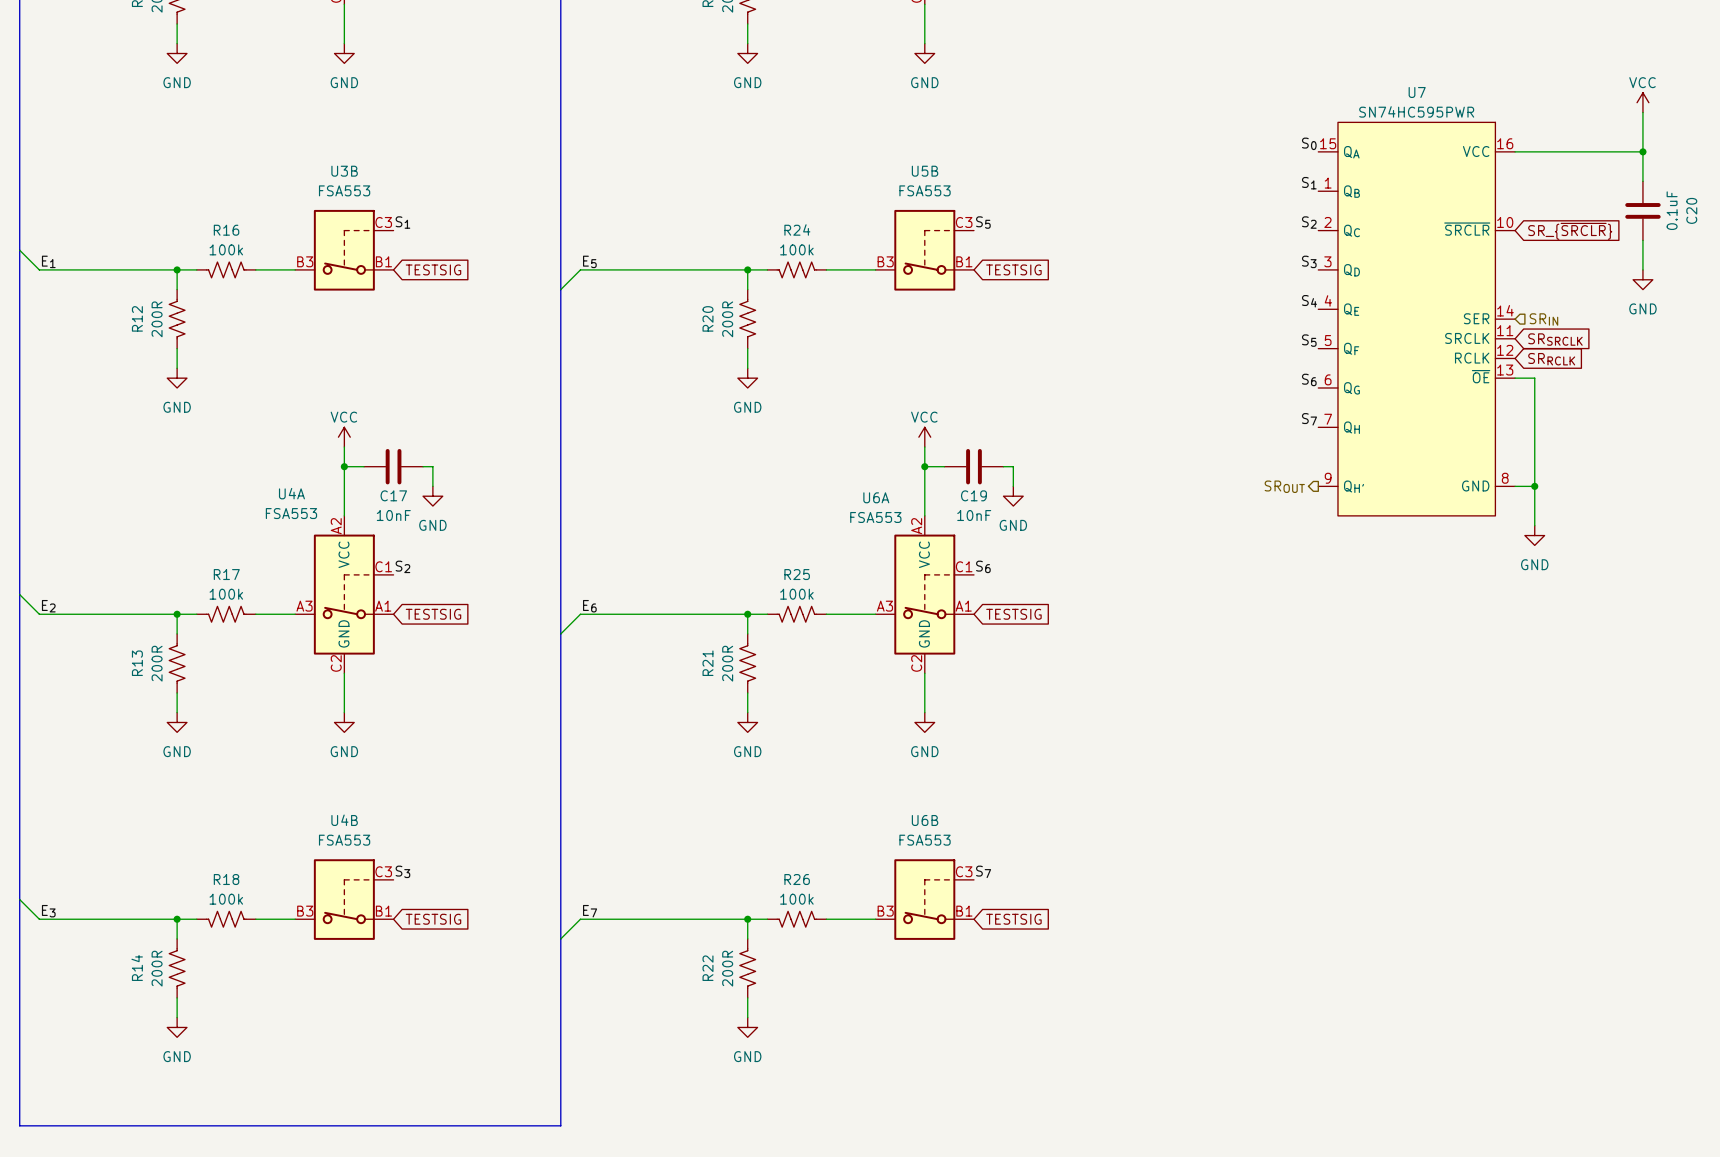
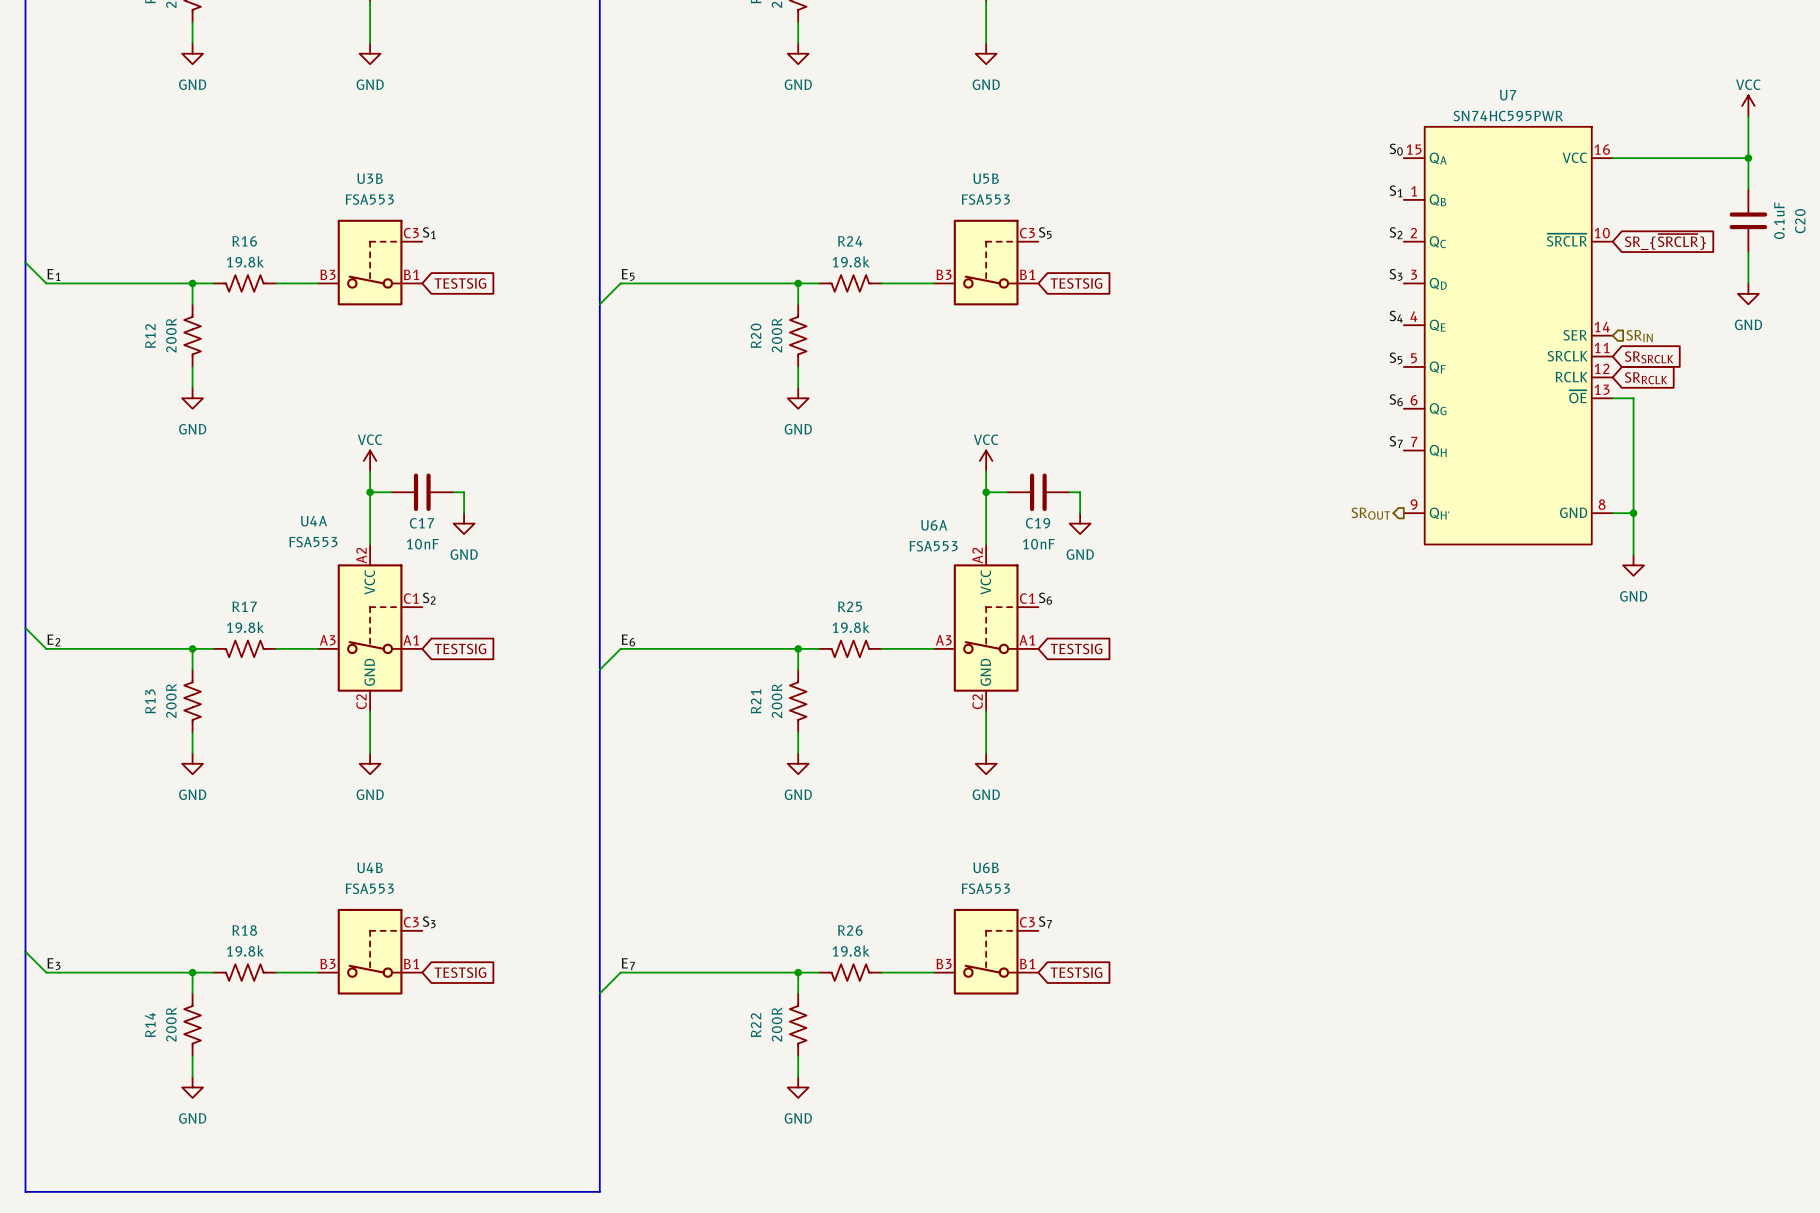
R16 value: 100k (226, 249) -> 19.8k (245, 261)
R24 value: 100k (796, 249) -> 19.8k (851, 261)
R17 value: 100k (226, 594) -> 19.8k (245, 627)
R25 value: 100k (796, 594) -> 19.8k (851, 627)
R18 value: 100k (226, 899) -> 19.8k (245, 951)
R26 value: 100k (796, 899) -> 19.8k (851, 951)

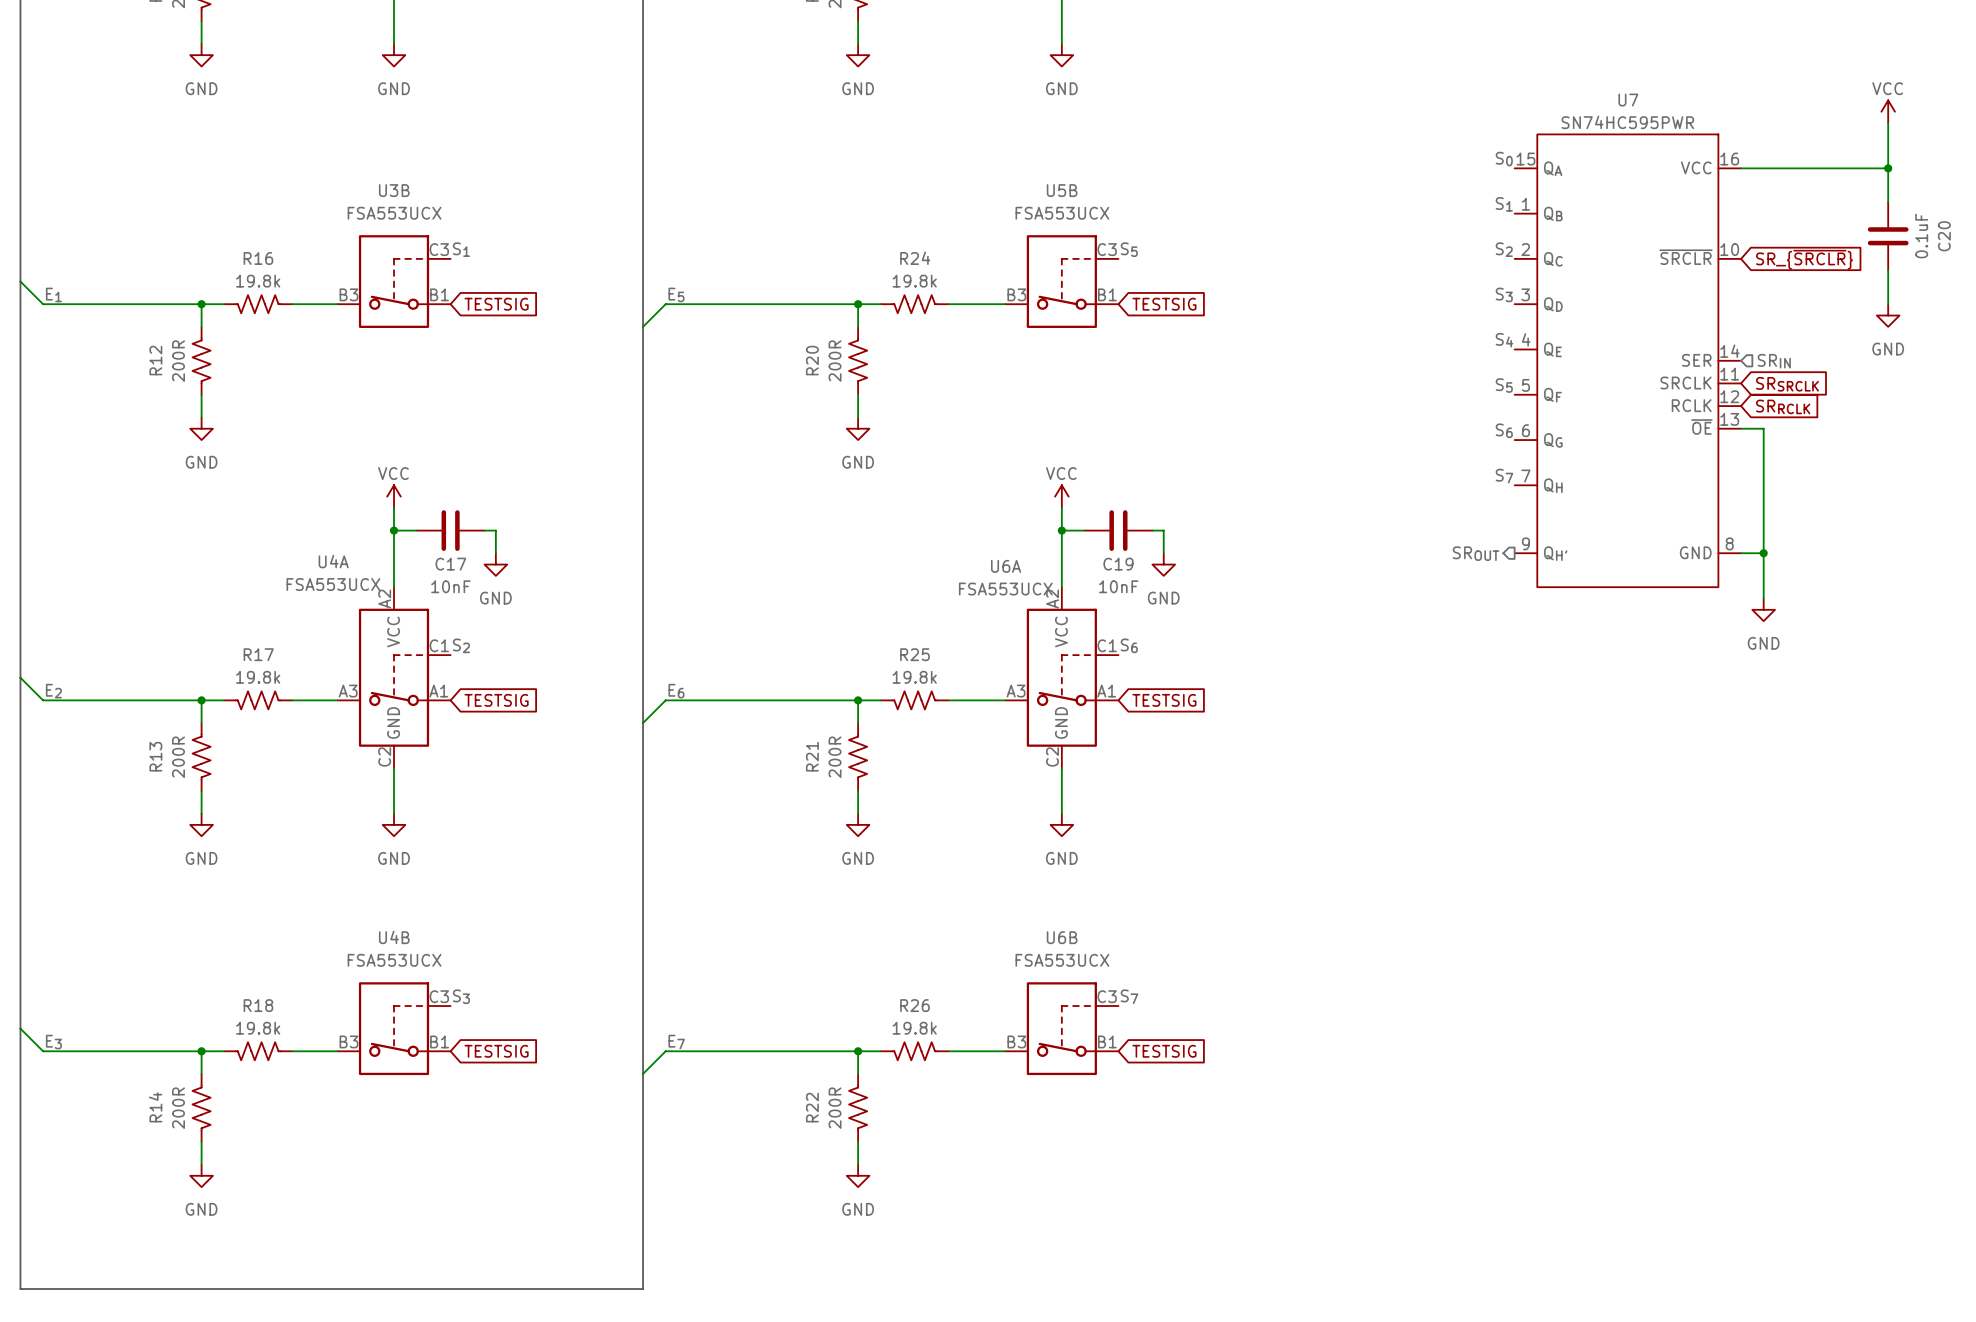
U3B value: FSA553 (369, 199) -> FSA553UCX (394, 213)
U5B value: FSA553 (985, 199) -> FSA553UCX (1062, 213)
U4A value: FSA553 (313, 542) -> FSA553UCX (333, 584)
U6A value: FSA553 (933, 546) -> FSA553UCX (1005, 589)
U4B value: FSA553 (369, 888) -> FSA553UCX (394, 960)
U6B value: FSA553 (985, 888) -> FSA553UCX (1062, 960)

